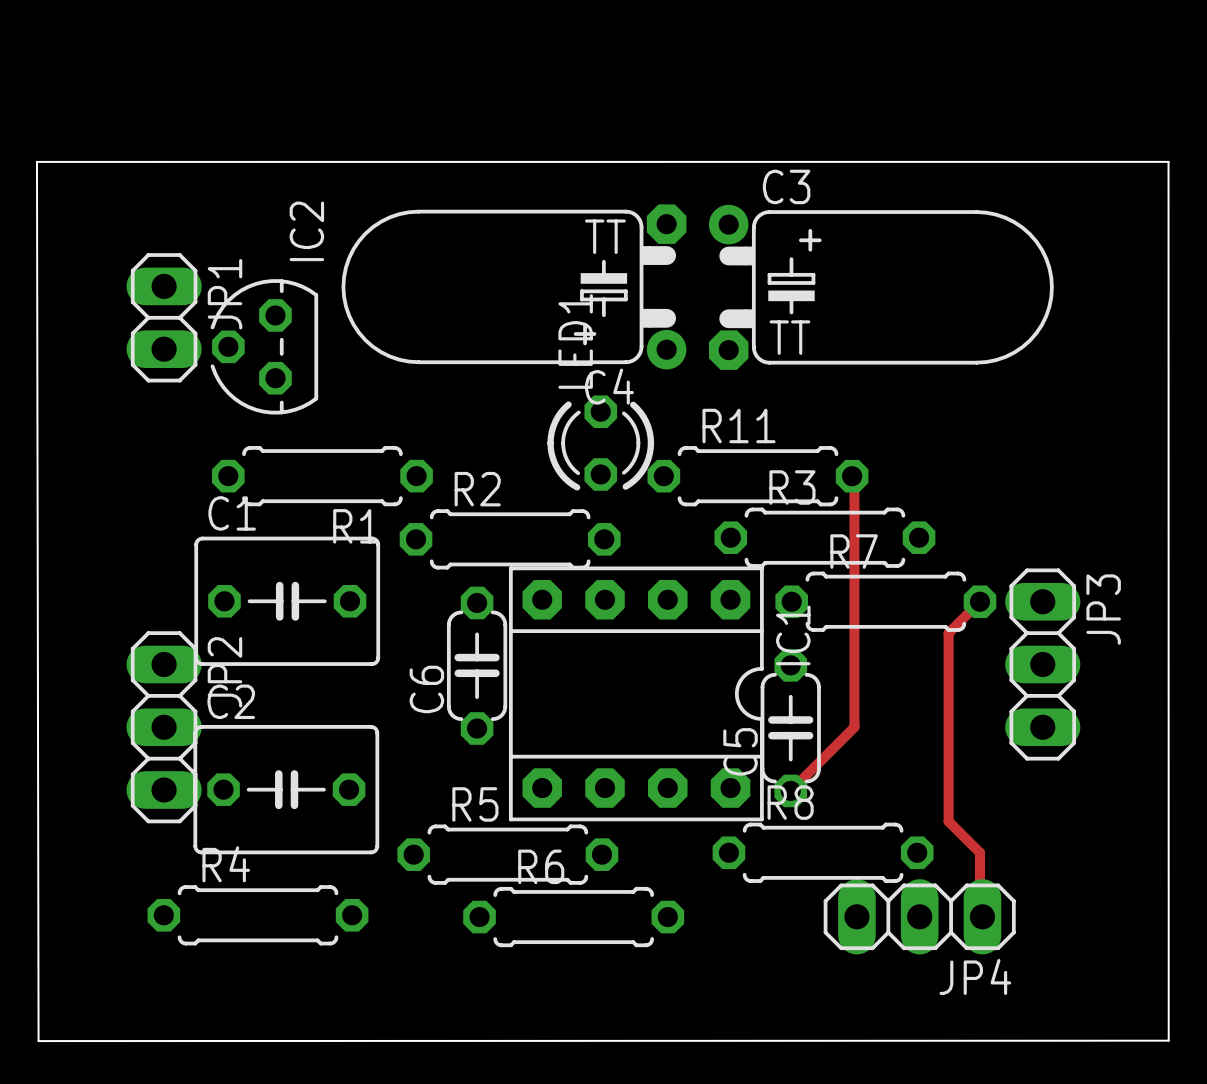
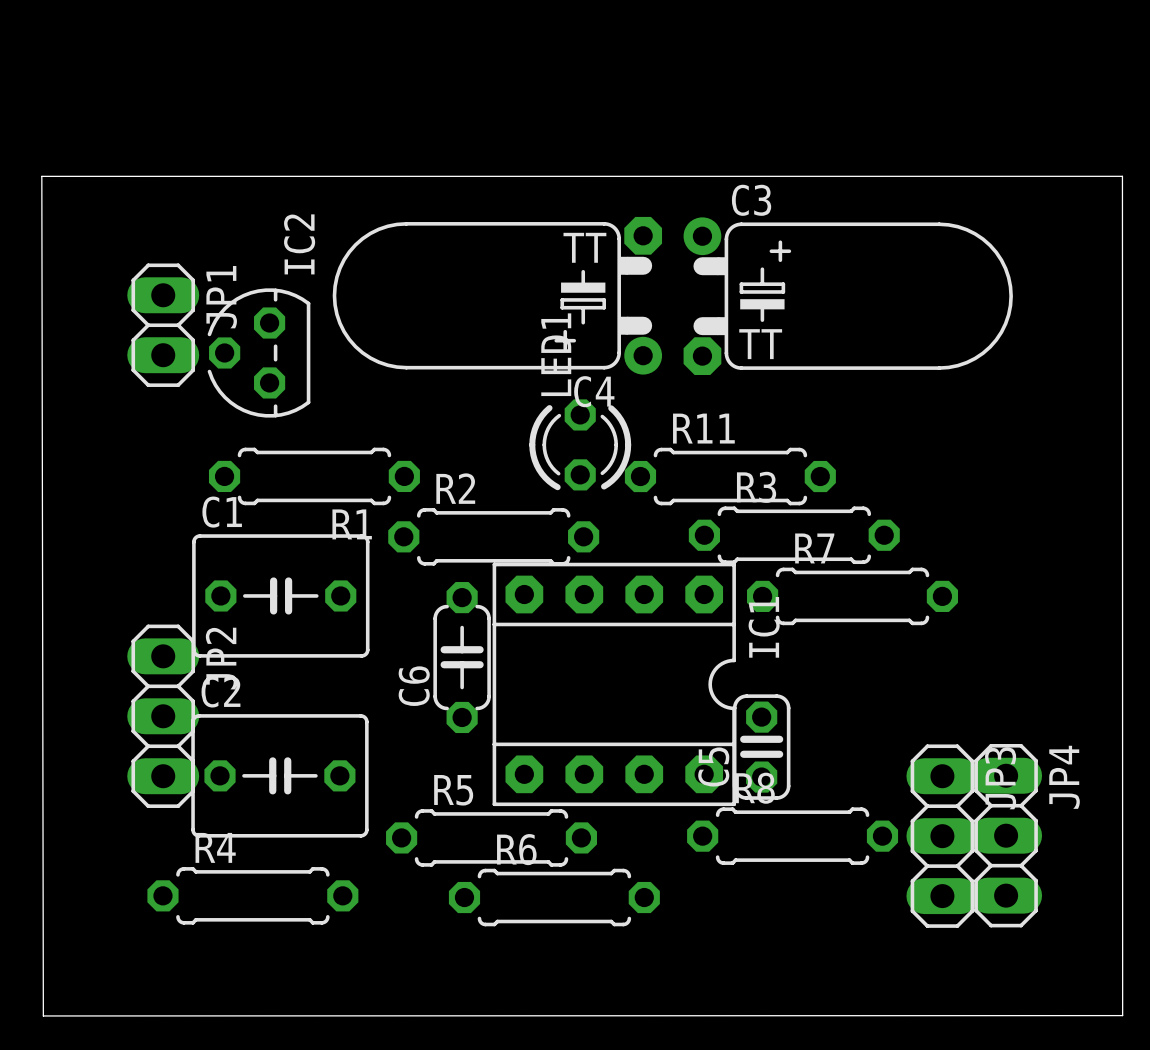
track: (852, 476) (854, 478) (854, 727) (790, 790) -> none
track: (979, 601) (948, 633) (948, 821) (979, 852) (979, 914) (982, 916) -> none
C5 footprint: [760, 649, 821, 808] -> [732, 694, 791, 800]
JP3 position: (1042, 664) -> (942, 836)
JP4 rotation: 0° (919, 916) -> 90° clockwise (1006, 835)
JP4 position: (919, 916) -> (1006, 835)
JP4 name position: JP4 (975, 976) -> JP4 (1064, 777)

